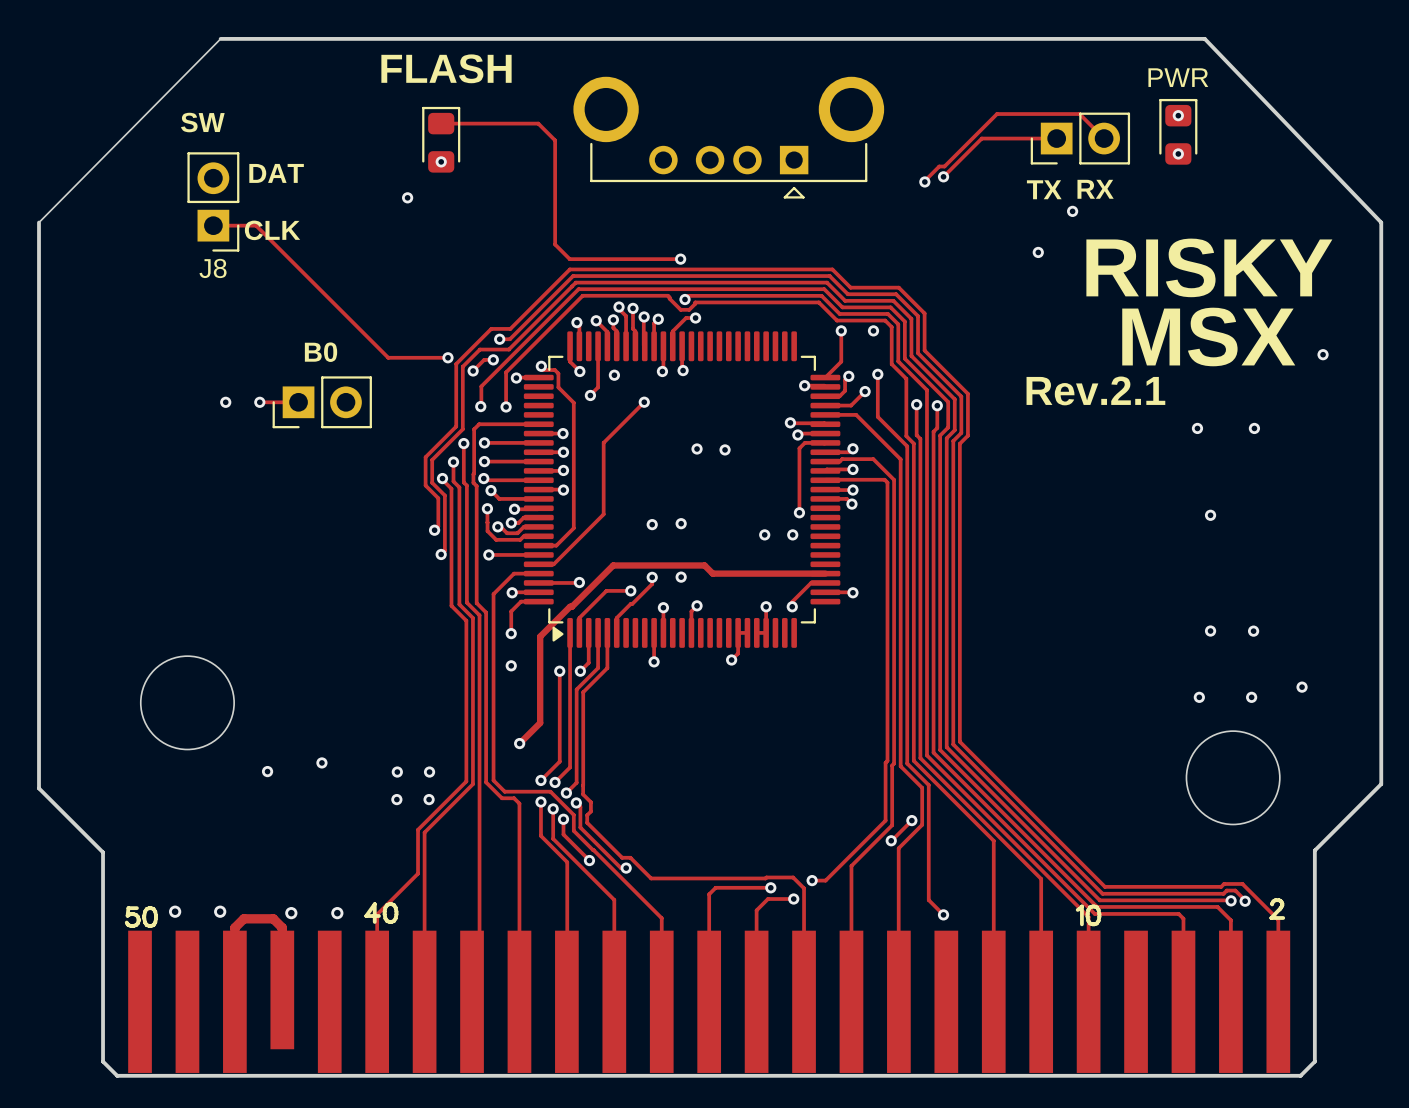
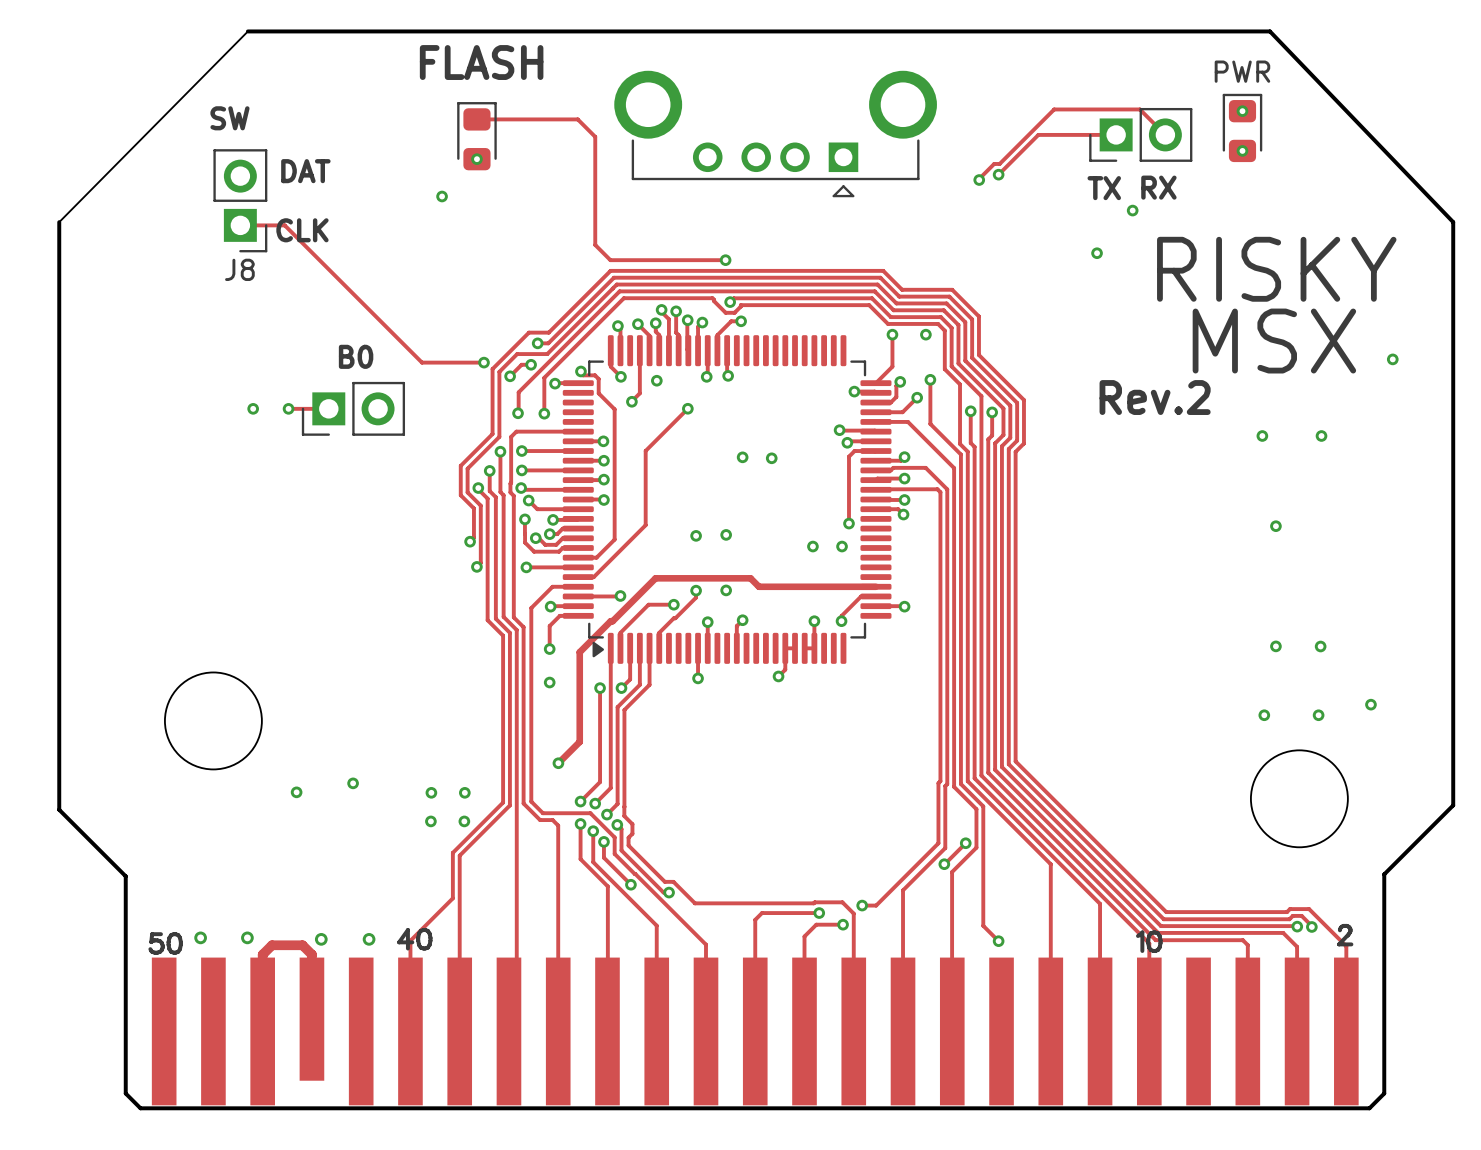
text: Rev.2.1 (1095, 390) -> Rev.2 (1155, 397)

